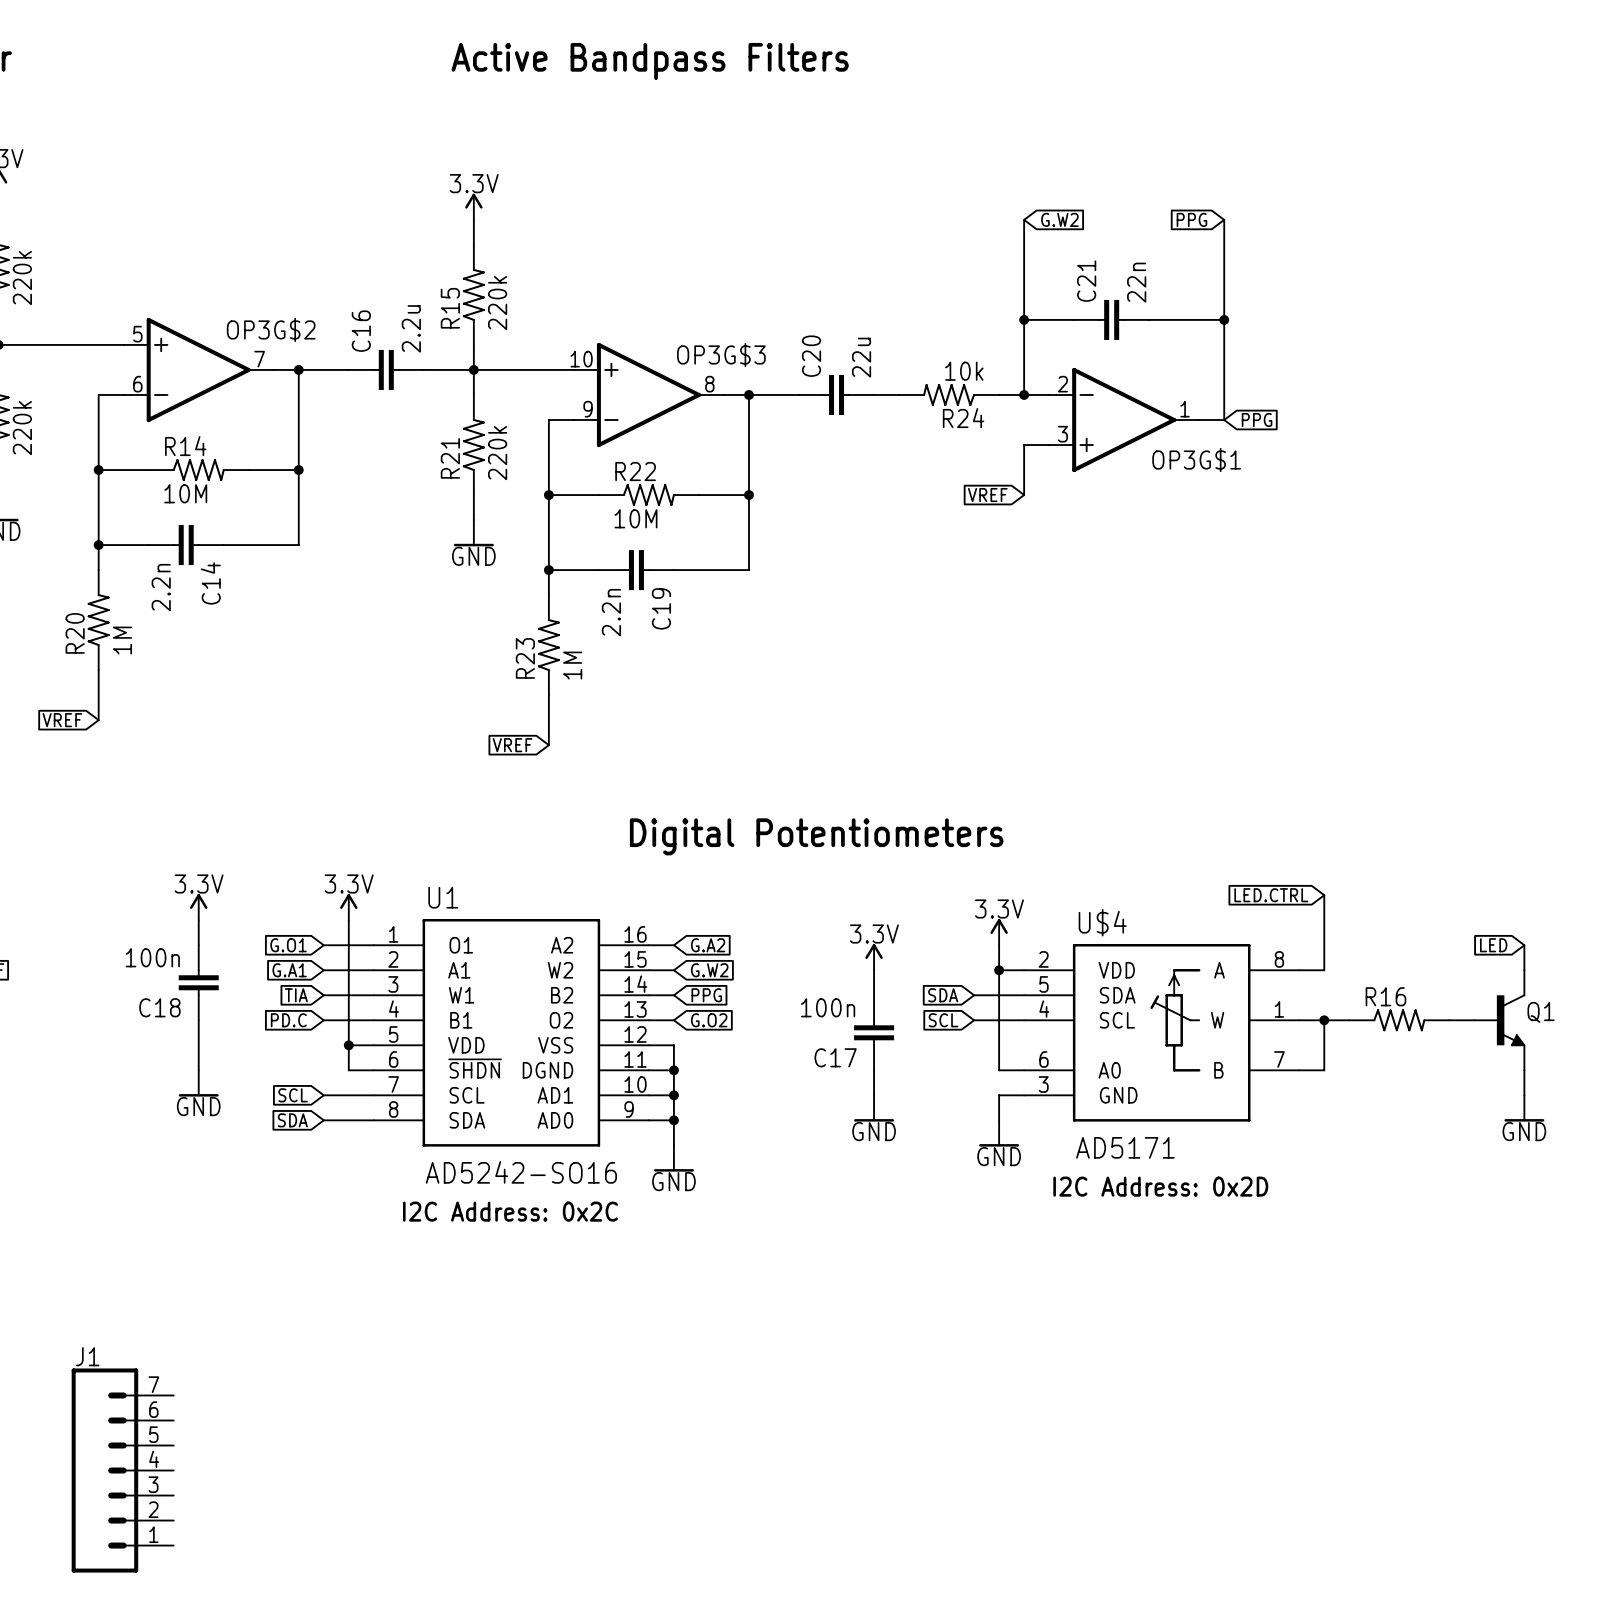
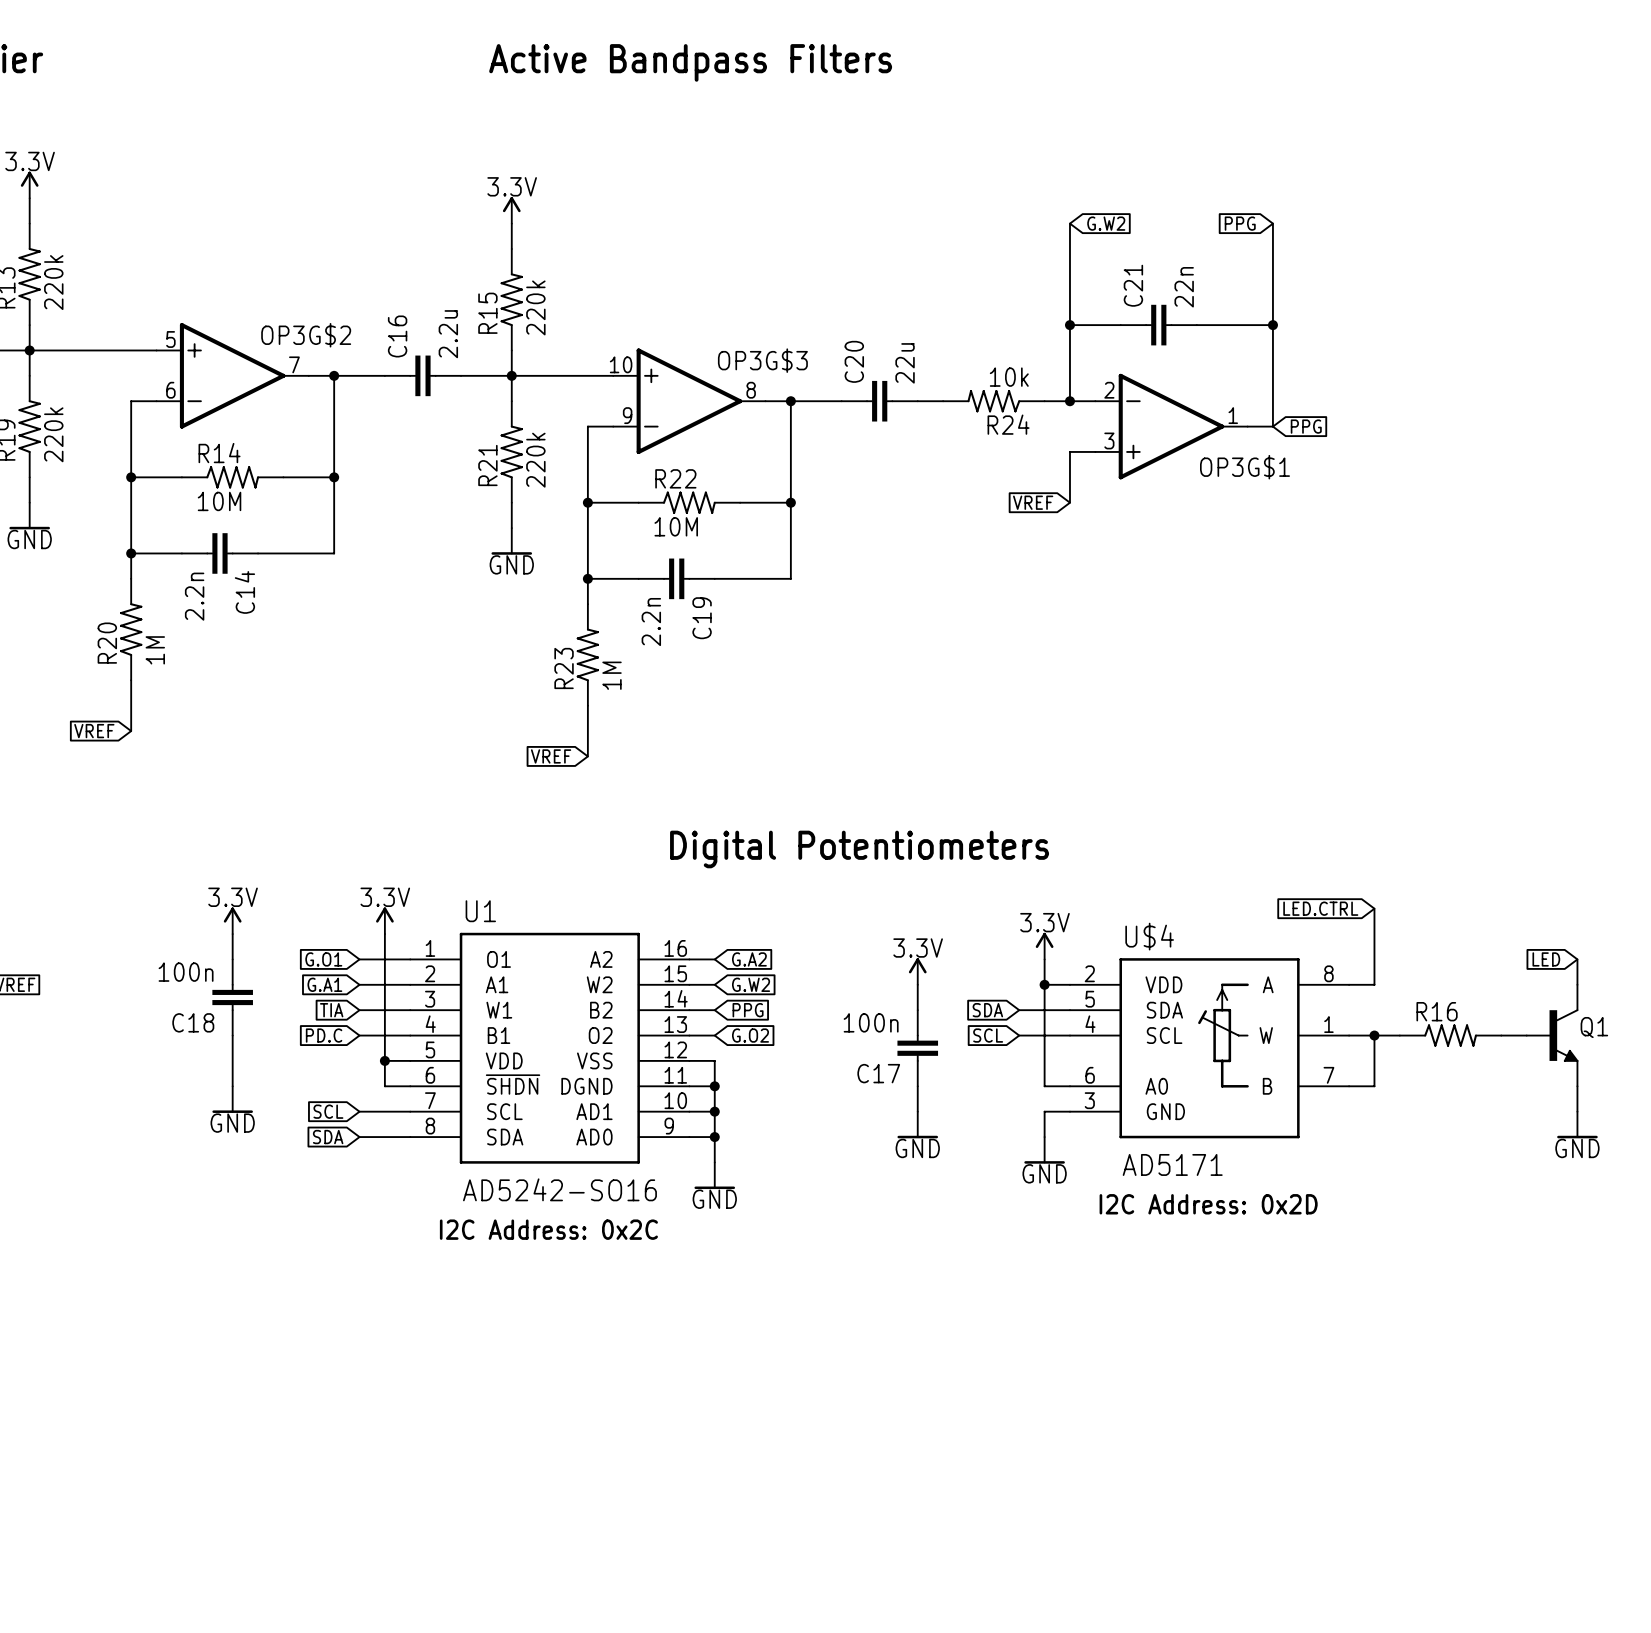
J1: (122, 1470) -> none

